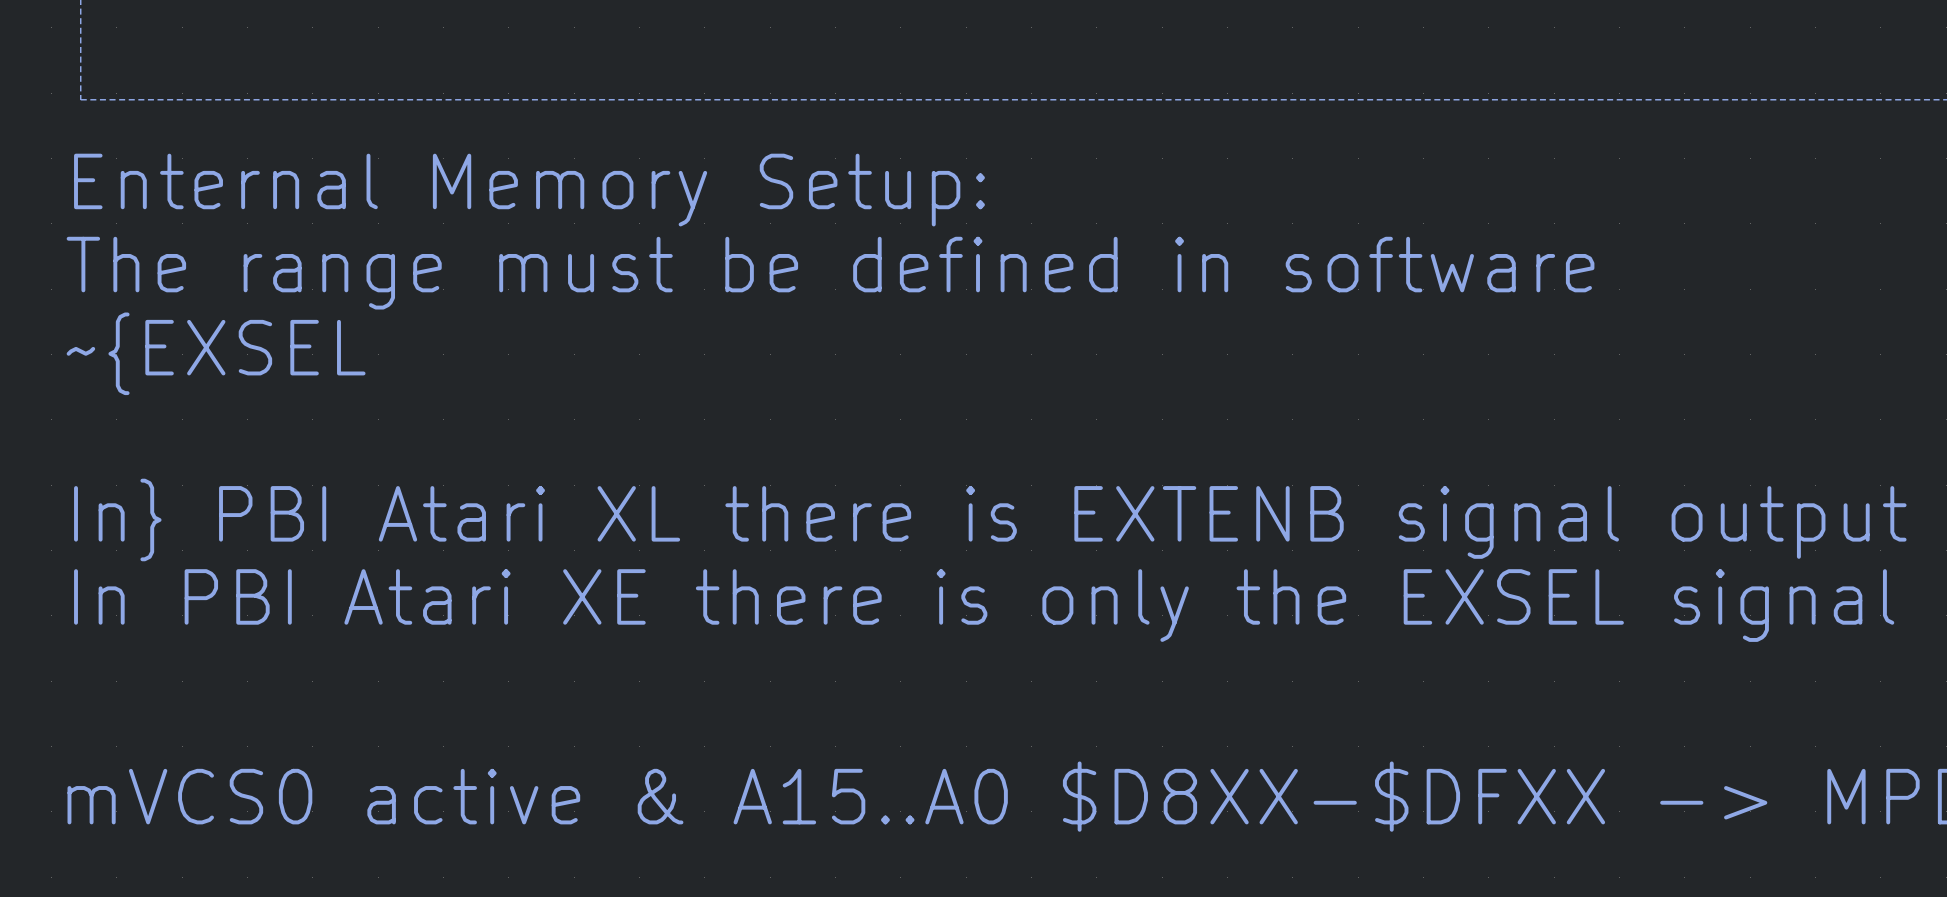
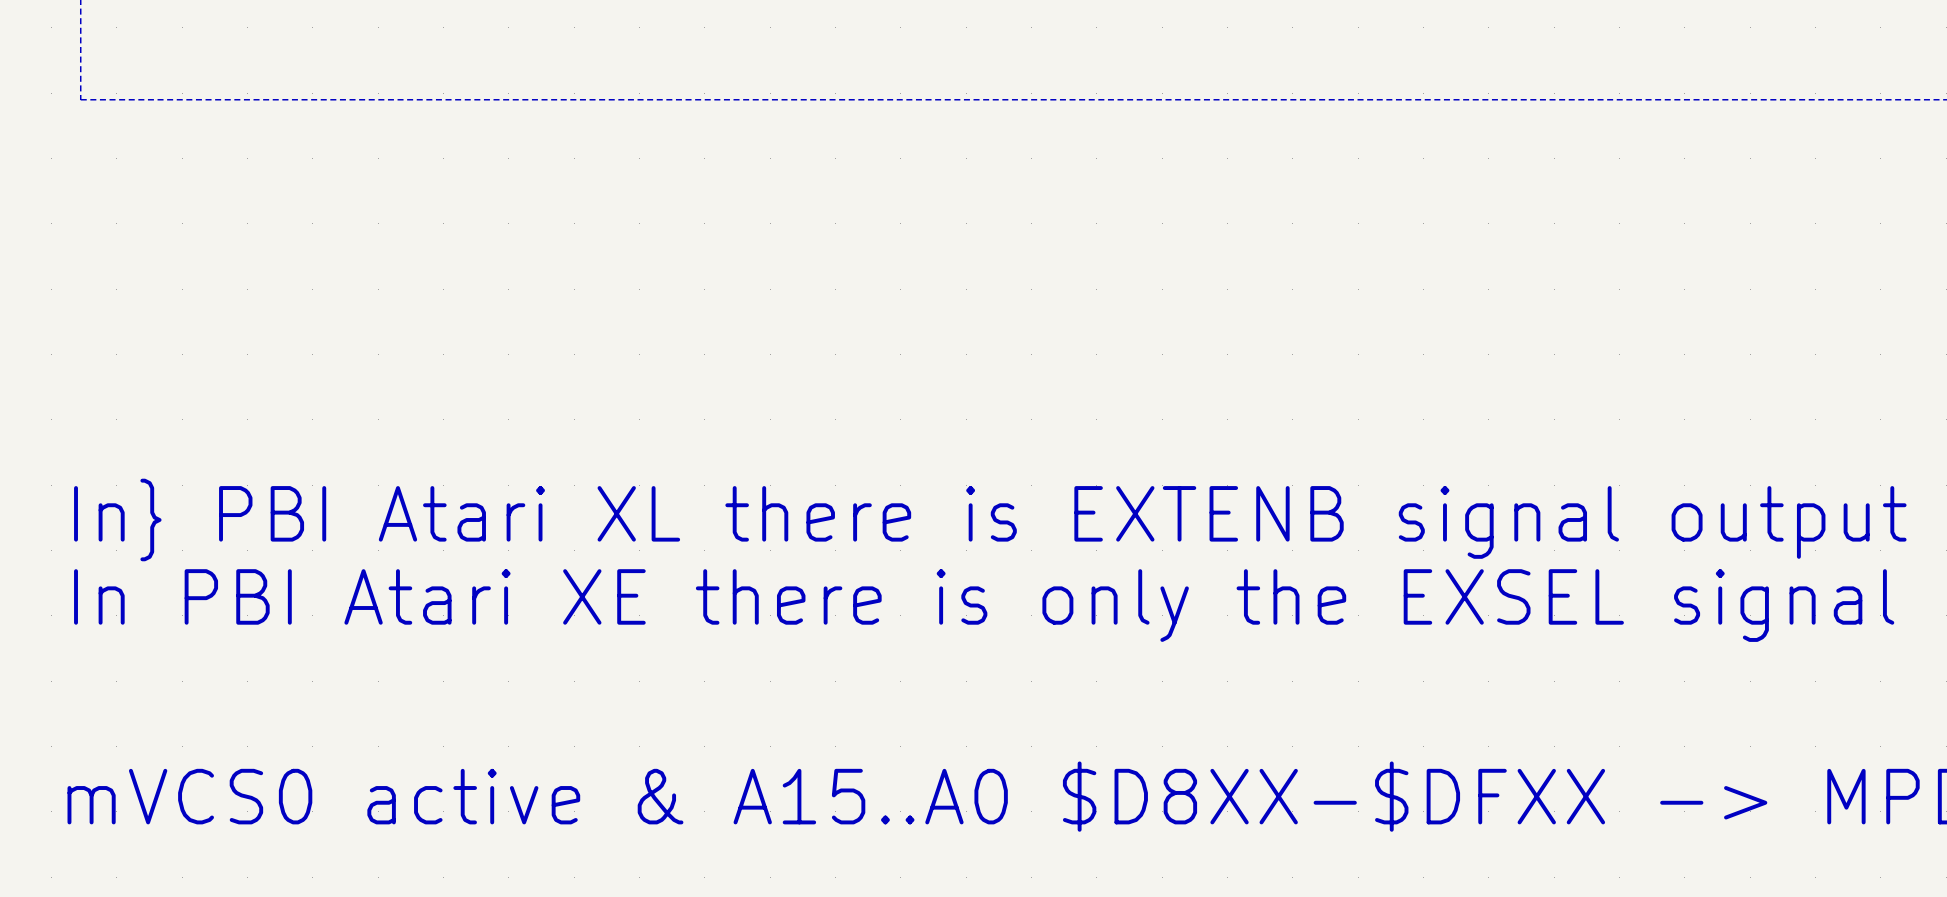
text: Enternal Memory Setup: (529, 190) -> none
text: The range must be defined in software (830, 273) -> none
text: ~{EXSEL (216, 353) -> none

